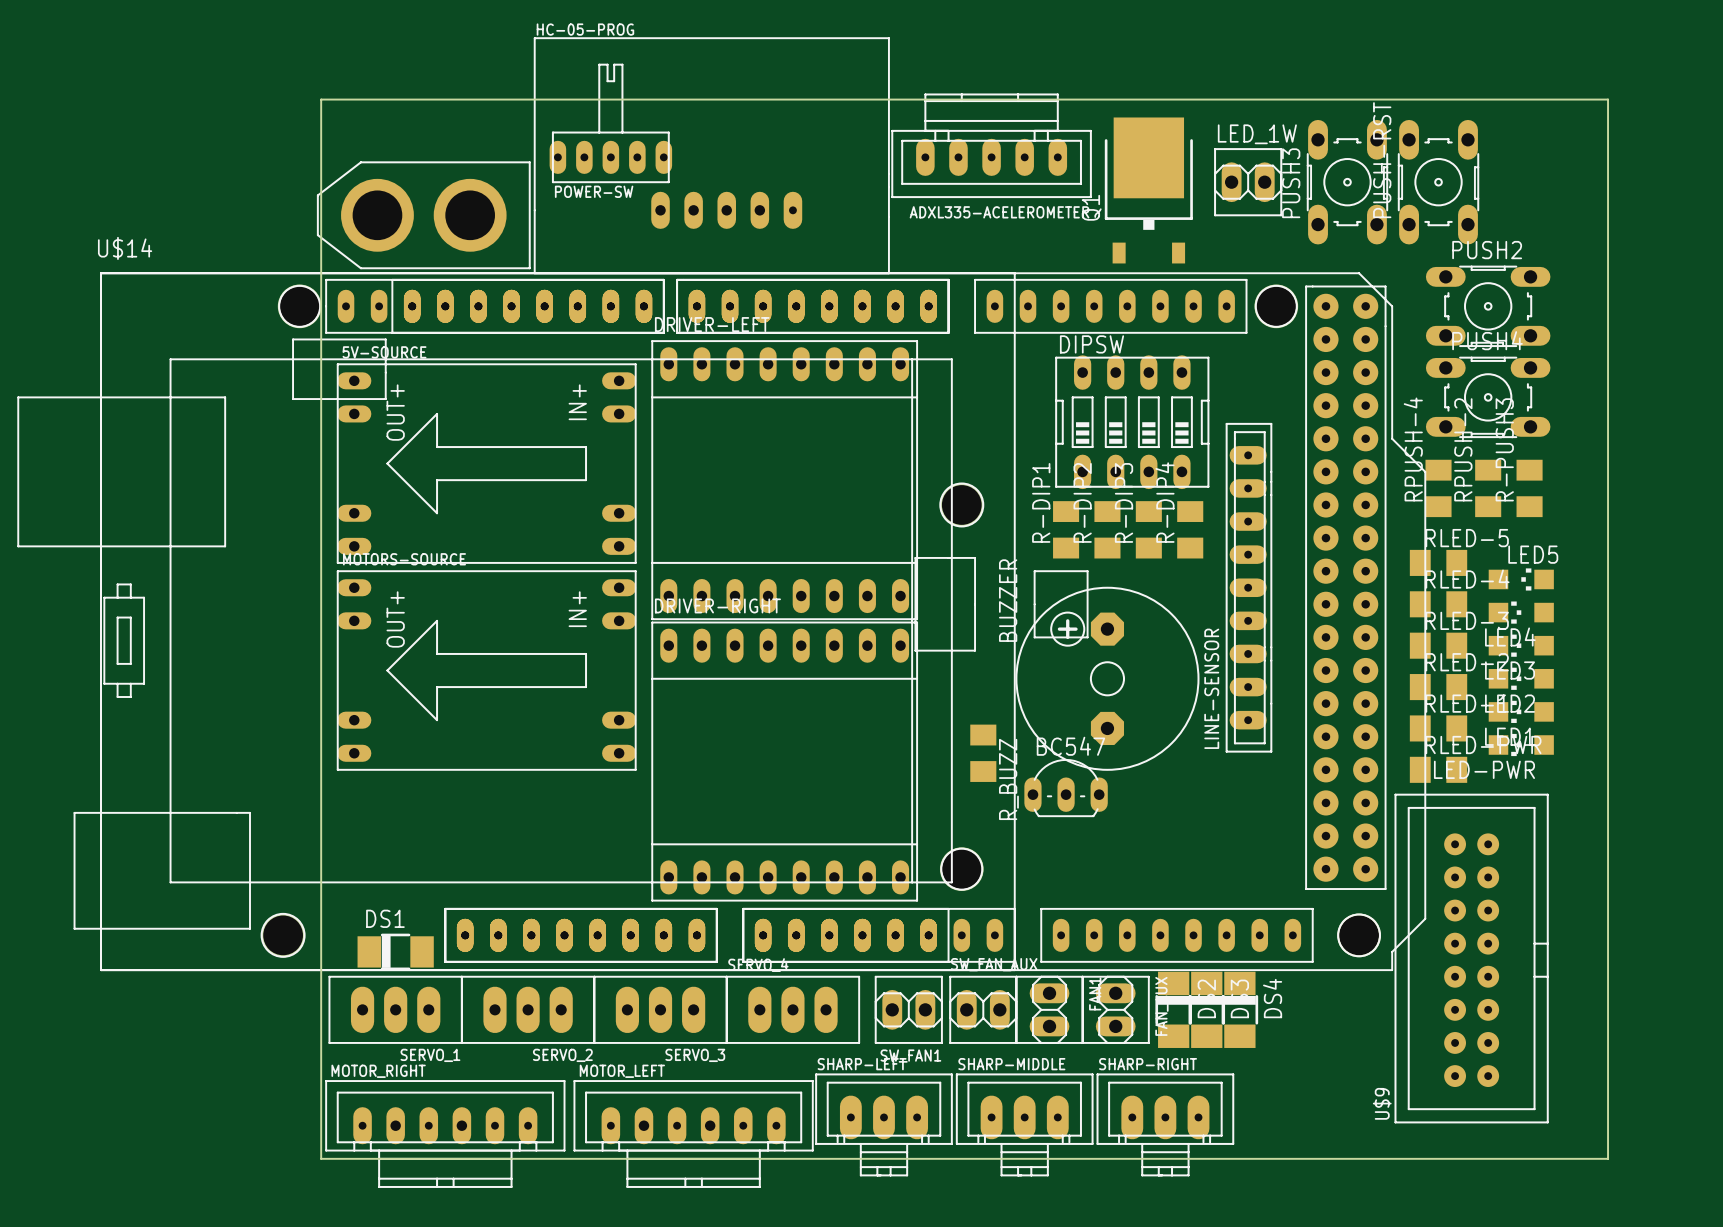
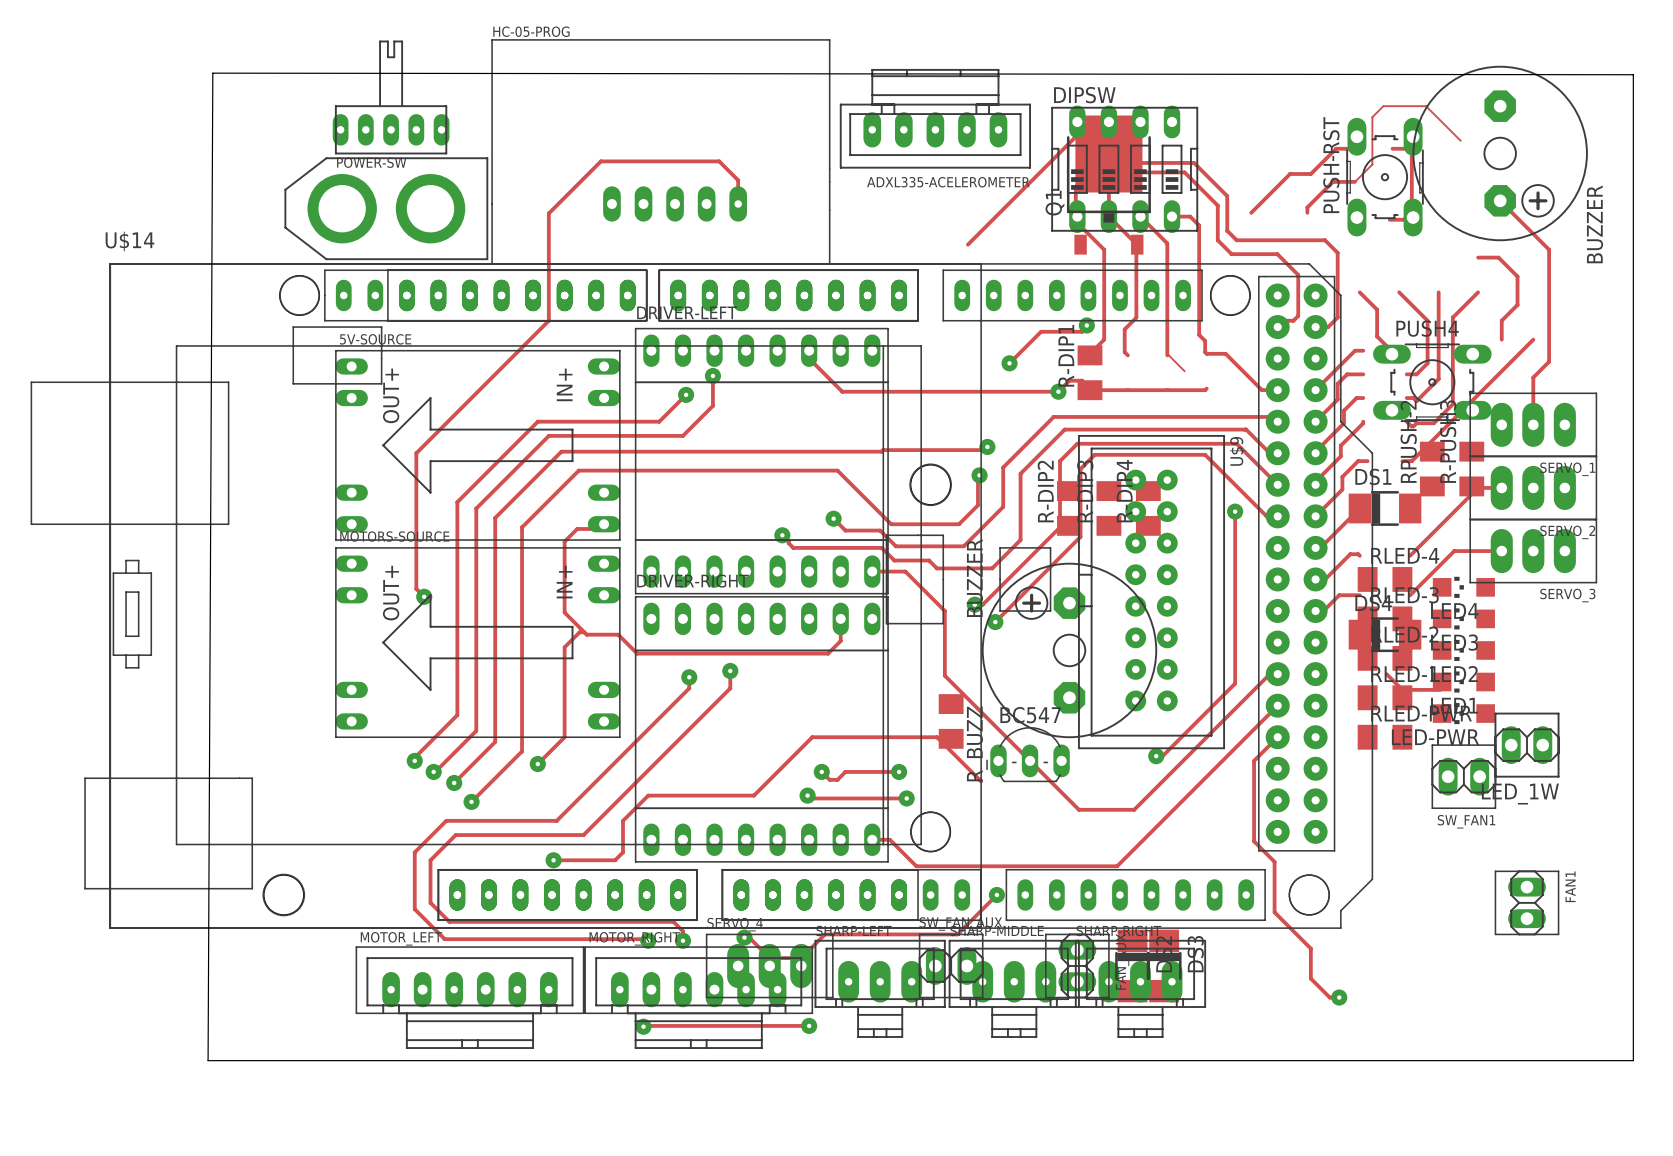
board edge: (321, 99) (1608, 99) (1608, 1158) (321, 1158) (321, 99) -> (212, 73) (208, 1060) (1633, 1060) (1633, 74) (212, 73)
POWER-SW position: (610, 123) -> (391, 97)
track: none -> (1077, 121) (1077, 135) (967, 244)
LED_1W name position: LED_1W (1257, 134) -> LED_1W (1520, 794)
track: none -> (1460, 140) (1426, 106) (1383, 106) (1372, 117) (1372, 164) (1355, 181) (1332, 181) (1307, 207) (1307, 212)
ADXL335-ACELEROMETER position: (991, 145) -> (935, 118)
track: none -> (1349, 148) (1336, 148) (1310, 174) (1290, 174) (1251, 212)
track: none -> (1392, 148) (1407, 148) (1411, 153) (1411, 211) (1403, 219) (1389, 219)
HC-05-PROG position: (711, 155) -> (660, 151)
BUZZER: none -> (1500, 153)
LED_1W position: (1248, 182) -> (1527, 745)
PUSH3: (1347, 182) -> none
track: none -> (1500, 200) (1549, 249) (1549, 361) (1533, 377) (1533, 424)
track: none -> (738, 203) (738, 180) (719, 161) (600, 161) (548, 213) (548, 320) (416, 453) (416, 588) (424, 596)
part position: (423, 215) -> (386, 208)
track: none -> (1140, 216) (1167, 243) (1167, 355) (1184, 371)
track: none -> (1172, 216) (1190, 216) (1199, 225) (1199, 334) (1205, 340) (1205, 352) (1225, 353) (1261, 390) (1277, 390)
track: none -> (1478, 257) (1498, 257) (1517, 276) (1517, 304) (1501, 320) (1501, 339)
track: none -> (1359, 292) (1377, 309) (1377, 336) (1391, 350) (1406, 350)
track: none -> (1399, 292) (1427, 320) (1427, 363) (1416, 374) (1406, 374)
track: none -> (1438, 292) (1438, 379) (1416, 401) (1413, 398) (1406, 398)
track: none -> (1478, 292) (1452, 317) (1452, 404) (1433, 423) (1416, 423) (1411, 426) (1406, 421)
PUSH2: (1488, 306) -> none
track: none -> (1086, 325) (1082, 331) (1041, 331) (1009, 363)
via: none -> (1086, 325)
track: none -> (1277, 327) (1284, 320) (1293, 320) (1298, 315) (1298, 274) (1277, 254) (1231, 254) (1217, 240) (1217, 205) (1184, 172) (1121, 172) (1108, 185) (1108, 216) (1136, 244) (1136, 317) (1124, 329) (1124, 352) (1127, 355)
track: none -> (1315, 327) (1328, 327) (1337, 317) (1337, 252) (1325, 240) (1236, 240) (1227, 230) (1227, 196) (1194, 162) (1099, 162) (1075, 186) (1077, 222) (1104, 249) (1104, 339) (1089, 355)
track: none -> (1533, 339) (1411, 461) (1402, 461)
track: none -> (809, 350) (809, 358) (842, 391) (1058, 391) (1069, 380) (1082, 380) (1089, 390) (1205, 390) (1206, 388)
track: none -> (1363, 350) (1355, 350) (1315, 390)
via: none -> (1009, 363)
track: none -> (1363, 374) (1347, 374) (1337, 383) (1337, 399) (1315, 421)
track: none -> (712, 375) (714, 377) (712, 405) (682, 435) (548, 435) (476, 508) (476, 730) (433, 771)
via: none -> (712, 375)
via: none -> (1058, 391)
track: none -> (686, 394) (659, 421) (537, 421) (457, 502) (457, 715) (414, 757) (414, 760)
via: none -> (686, 394)
track: none -> (1363, 398) (1356, 398) (1343, 410) (1343, 423) (1315, 453)
DIPSW position: (1132, 422) -> (1124, 169)
track: none -> (1277, 421) (1273, 416) (1053, 416) (1003, 467) (1003, 506) (963, 546) (895, 546) (880, 530) (845, 530) (833, 518)
track: none -> (1363, 421) (1340, 445) (1340, 456) (1315, 481) (1315, 484)
track: none -> (987, 446) (990, 446) (990, 450) (561, 451) (495, 517) (495, 741) (454, 782)
via: none -> (987, 446)
track: none -> (1277, 453) (1269, 453) (1246, 429) (1064, 429) (1020, 473) (1020, 540) (992, 568) (936, 568) (929, 560) (894, 560) (881, 547) (793, 547) (782, 535)
track: none -> (1367, 461) (1358, 461) (1342, 476) (1342, 489) (1315, 516)
RPUSH-4: (1438, 488) -> none
track: none -> (979, 475) (977, 505) (959, 524) (891, 524) (837, 470) (578, 470) (522, 527) (522, 751) (471, 801)
via: none -> (979, 475)
track: none -> (1277, 484) (1236, 443) (1077, 443) (1060, 461) (1060, 527) (982, 604) (973, 606)
track: none -> (1501, 487) (1478, 487) (1410, 555)
R-DIP1 position: (1066, 529) -> (1089, 372)
track: none -> (1359, 508) (1320, 547) (1315, 547)
track: none -> (1235, 511) (1235, 683) (1162, 756) (1154, 756)
via: none -> (1235, 511)
track: none -> (1277, 516) (1266, 516) (1205, 454) (1094, 454) (1080, 469) (1080, 536) (995, 622)
via: none -> (833, 518)
track: none -> (604, 528) (577, 528) (564, 541) (564, 612) (586, 634) (618, 634) (637, 653) (828, 653) (840, 640) (840, 618)
via: none -> (782, 535)
RLED-5: (1438, 562) -> none
track: none -> (1501, 551) (1454, 551) (1410, 595)
track: none -> (1359, 555) (1350, 554) (1325, 579) (1315, 579)
LED5: (1521, 579) -> none
LINE-SENSOR: (1248, 587) -> none
track: none -> (872, 571) (905, 571) (944, 611) (944, 675) (1078, 809) (1134, 809) (1269, 674) (1277, 674)
track: none -> (1359, 595) (1339, 595) (1323, 611) (1315, 611)
via: none -> (424, 596)
via: none -> (974, 604)
via: none -> (995, 622)
track: none -> (584, 632) (579, 632) (564, 647) (564, 737) (537, 764)
track: none -> (730, 670) (730, 688) (583, 835) (455, 835) (430, 860) (430, 902) (449, 921) (673, 921) (682, 931) (682, 940)
via: none -> (730, 670)
track: none -> (1386, 674) (1402, 689) (1440, 689)
track: none -> (689, 677) (689, 688) (556, 820) (446, 820) (414, 852) (414, 909) (444, 939) (646, 939) (648, 940)
via: none -> (689, 677)
track: none -> (1277, 705) (1117, 866) (916, 866) (889, 839) (872, 839)
track: none -> (1277, 737) (1254, 760) (1254, 841) (1274, 861) (1274, 912) (1310, 948) (1310, 978) (1329, 997) (1339, 997)
via: none -> (1156, 756)
via: none -> (414, 760)
via: none -> (537, 764)
via: none -> (433, 771)
track: none -> (821, 771) (829, 779) (837, 779) (845, 771) (899, 771)
via: none -> (821, 771)
via: none -> (899, 771)
track: none -> (981, 781) (936, 737) (812, 737) (753, 795) (648, 795) (623, 820) (623, 852) (615, 860) (553, 860)
via: none -> (454, 782)
track: none -> (807, 795) (812, 798) (906, 798)
via: none -> (807, 795)
via: none -> (906, 798)
via: none -> (471, 801)
via: none -> (553, 860)
track: none -> (996, 894) (957, 934) (824, 934) (801, 958) (769, 958) (749, 937) (744, 937)
via: none -> (996, 894)
DS1 position: (395, 951) -> (1385, 508)
U$9 rotation: 0° (1471, 958) -> 180° (1151, 592)
U$9 position: (1471, 958) -> (1151, 592)
via: none -> (744, 937)
via: none -> (648, 940)
via: none -> (682, 940)
SERVO_1 position: (395, 1009) -> (1533, 424)
SERVO_2 position: (528, 1009) -> (1533, 487)
SERVO_3 position: (660, 1009) -> (1533, 551)
SW_FAN1 position: (908, 1009) -> (1463, 776)
FAN1 position: (1049, 1009) -> (1527, 902)
DS4 rotation: 0° (1239, 1009) -> 90° counterclockwise (1385, 634)
DS4 position: (1239, 1009) -> (1385, 634)
via: none -> (1339, 997)
track: none -> (809, 1025) (643, 1026)
via: none -> (809, 1025)
via: none -> (643, 1026)
SHARP-LEFT position: (883, 1124) -> (880, 988)
SHARP-MIDDLE position: (1024, 1124) -> (1014, 988)
SHARP-RIGHT position: (1165, 1124) -> (1140, 988)
MOTOR_RIGHT position: (445, 1134) -> (698, 997)
MOTOR_LEFT position: (693, 1134) -> (469, 997)

